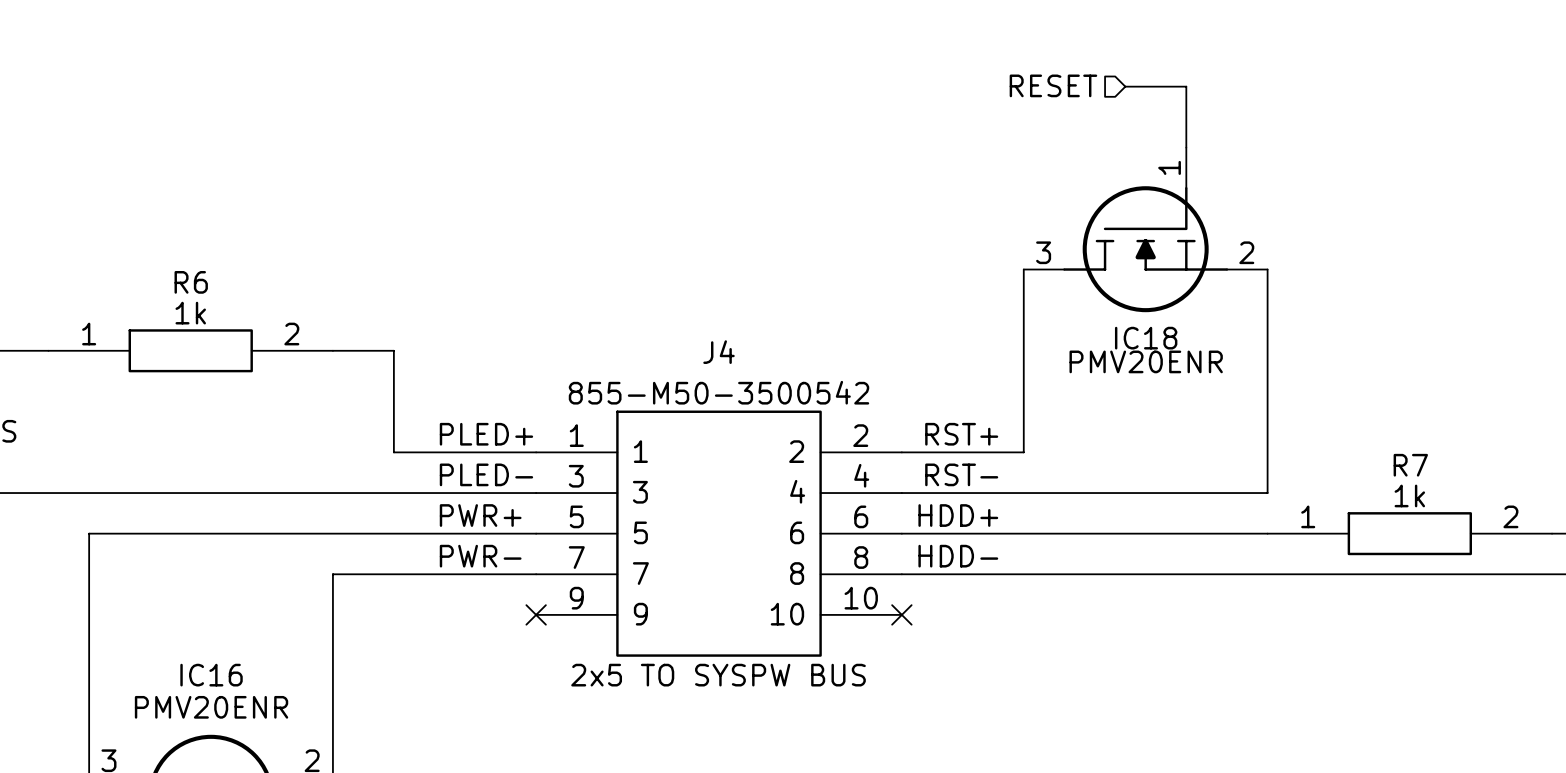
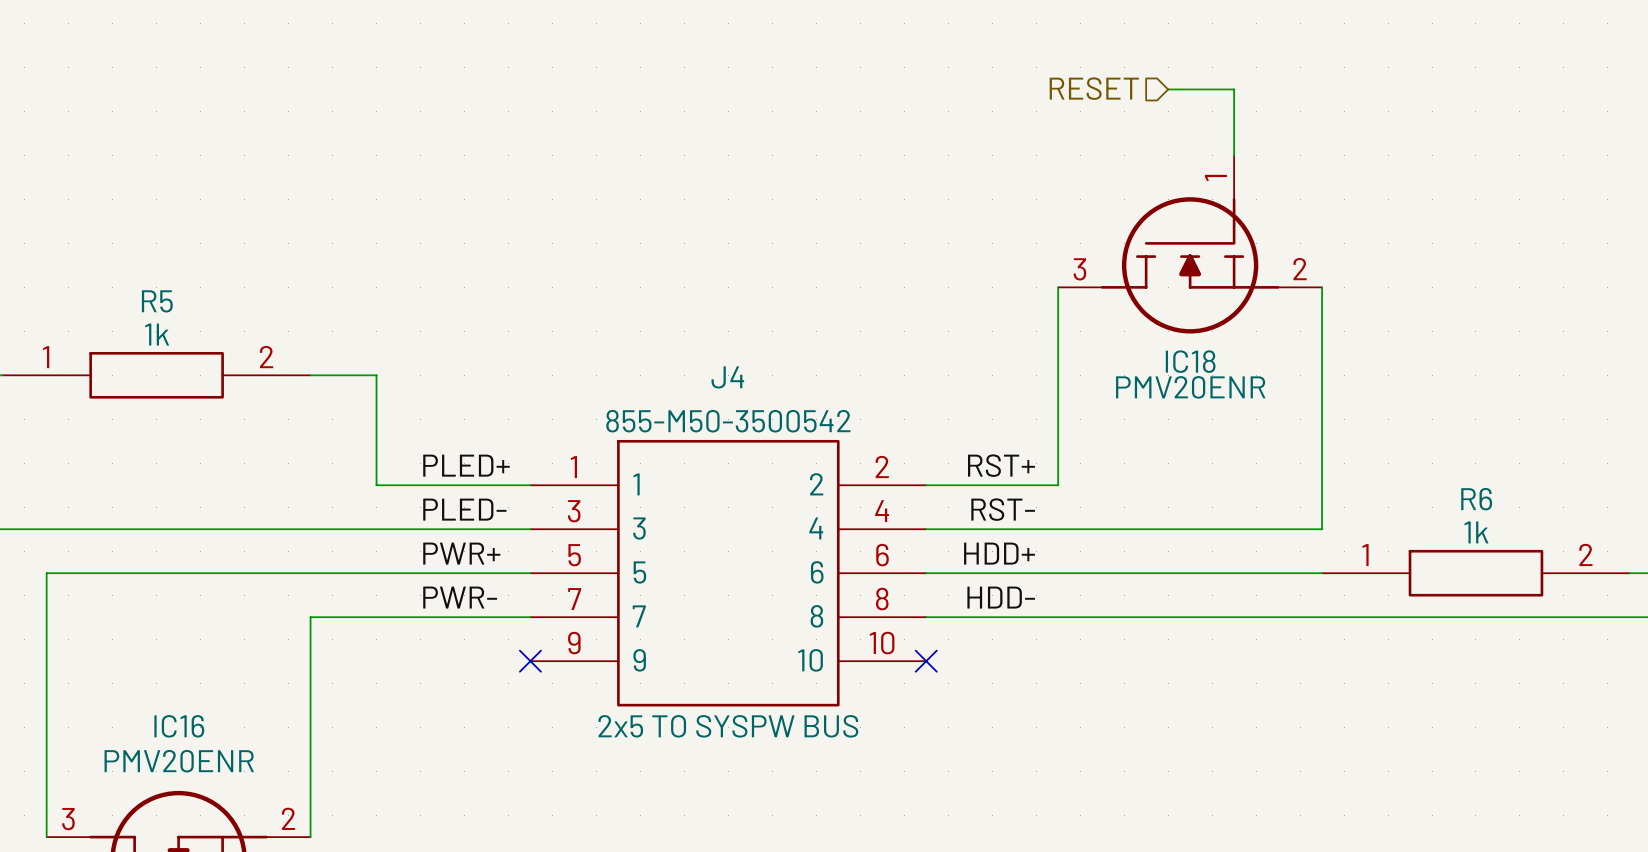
R6 name: R6 (191, 282) -> R5 (157, 301)
R7 name: R7 (1410, 465) -> R6 (1476, 499)

